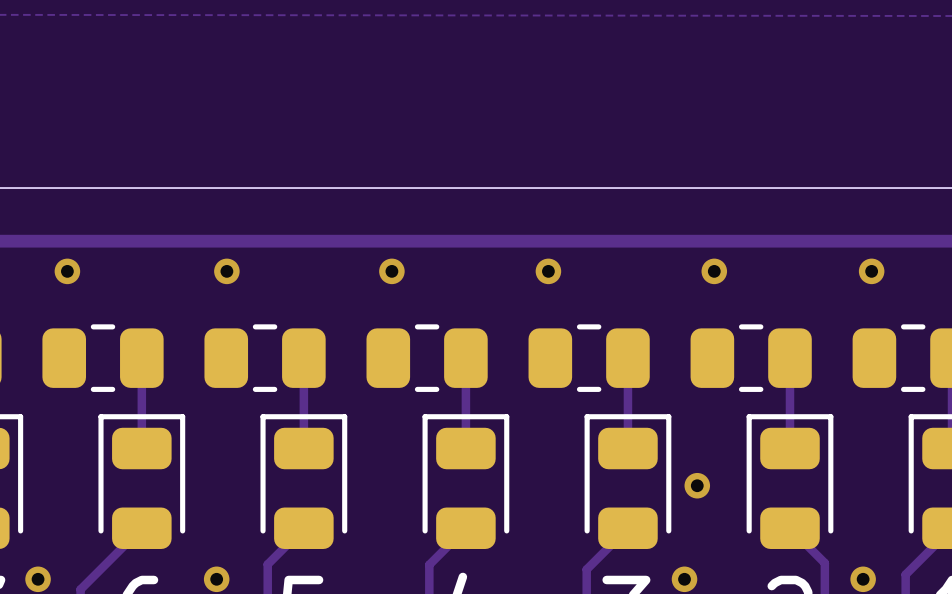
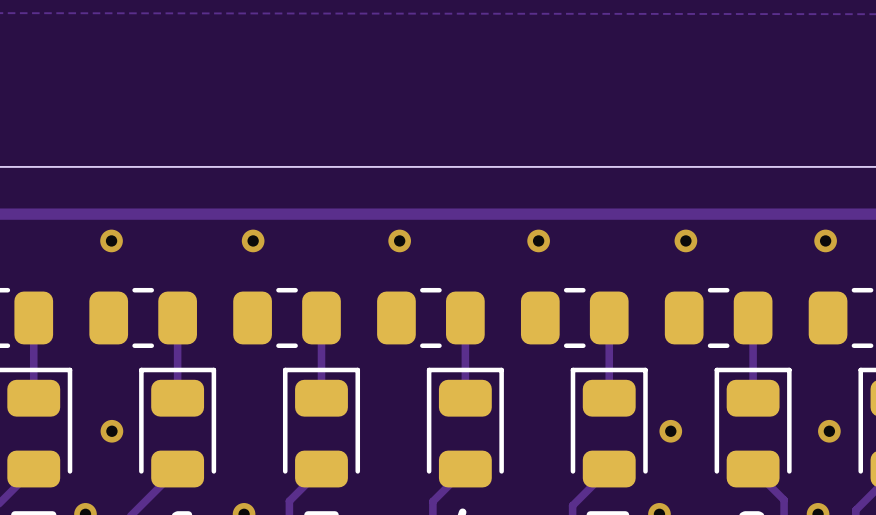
via: none -> (111, 431)
via: none -> (829, 431)

